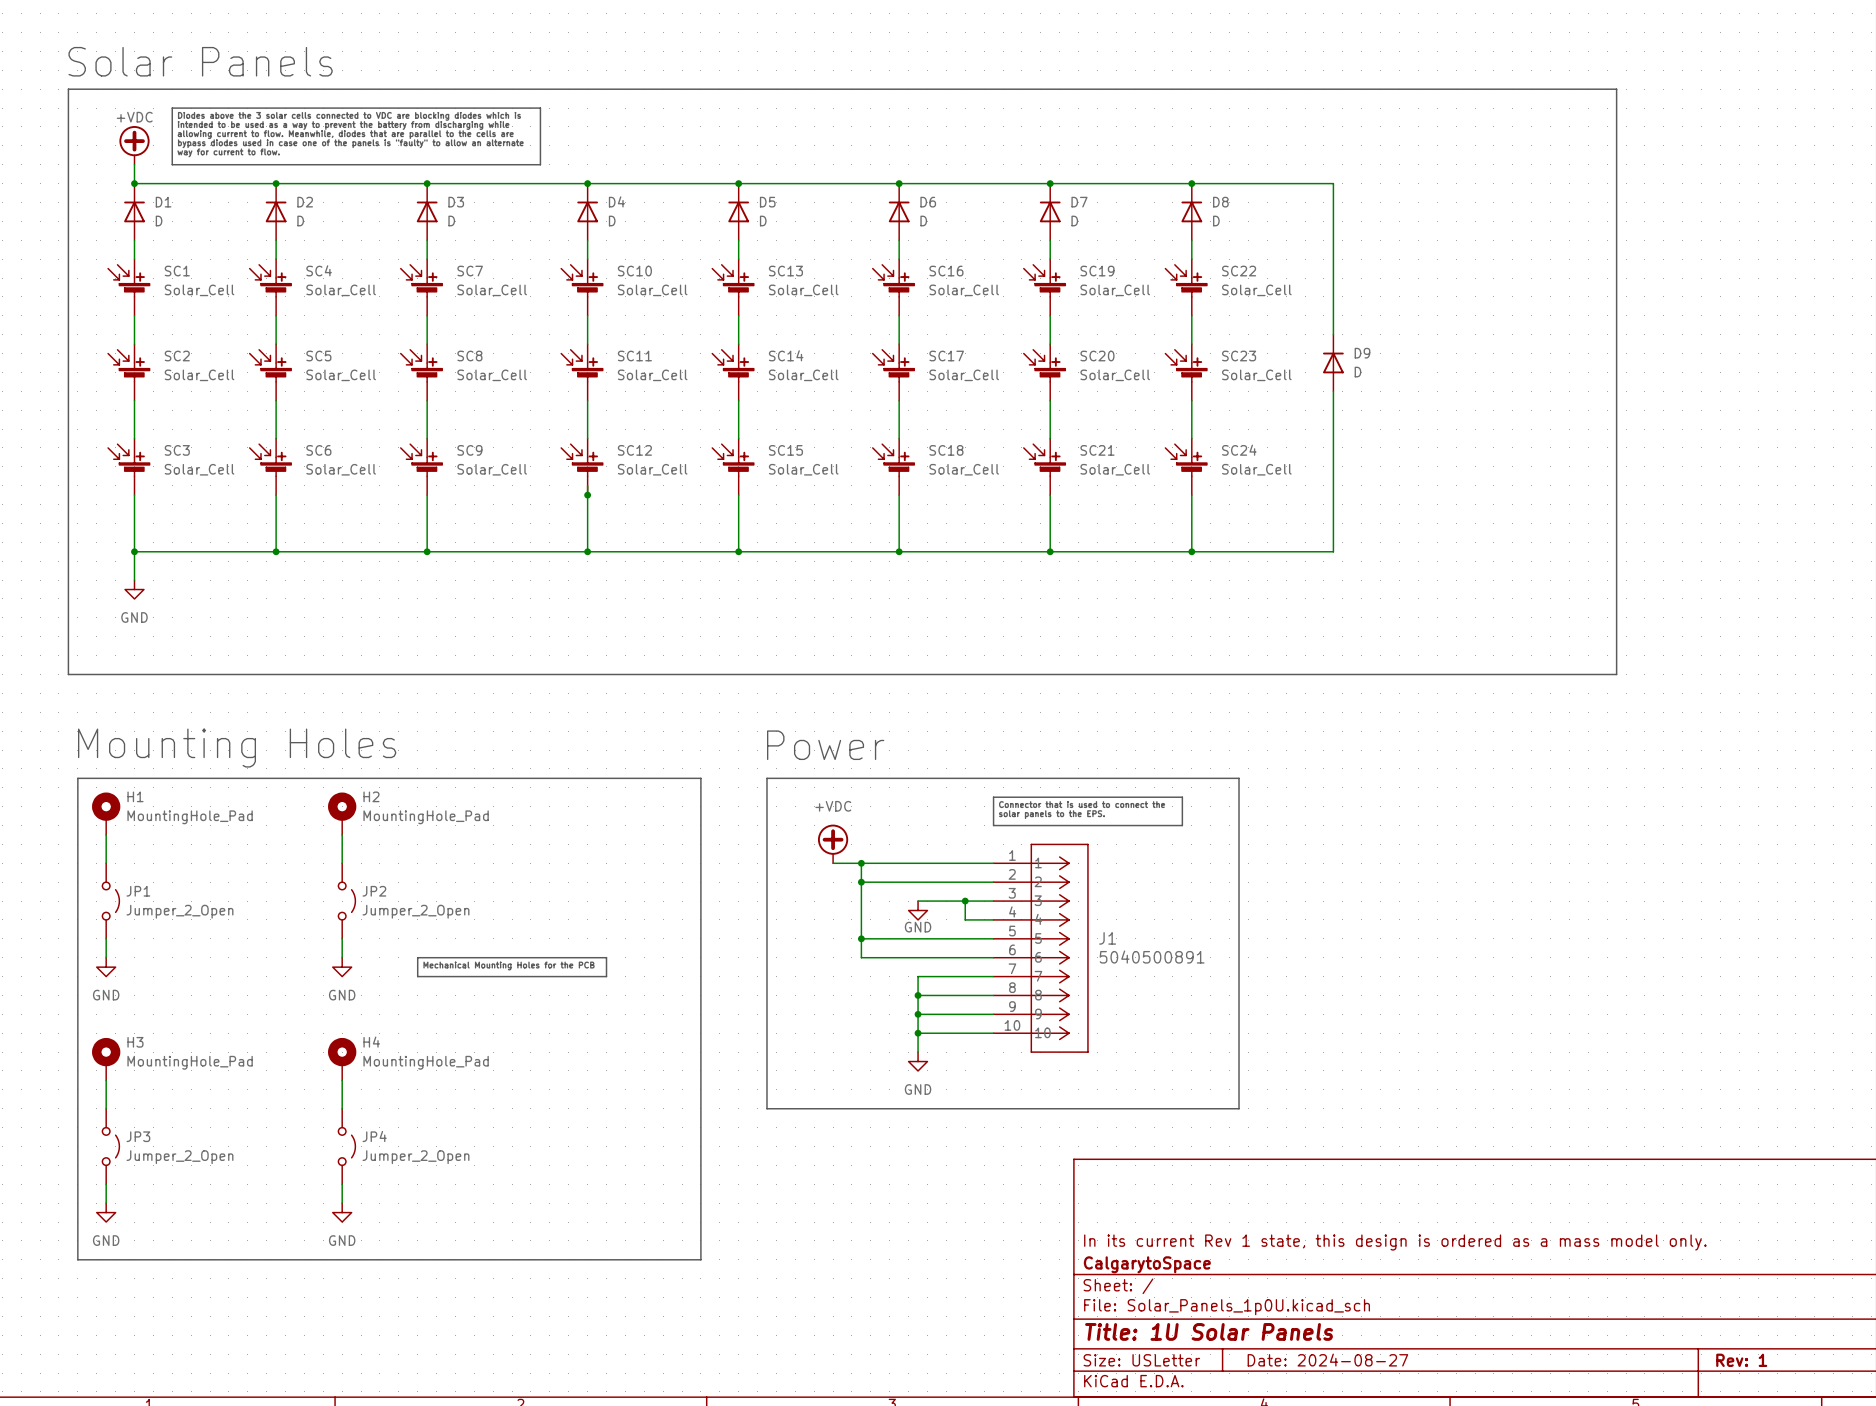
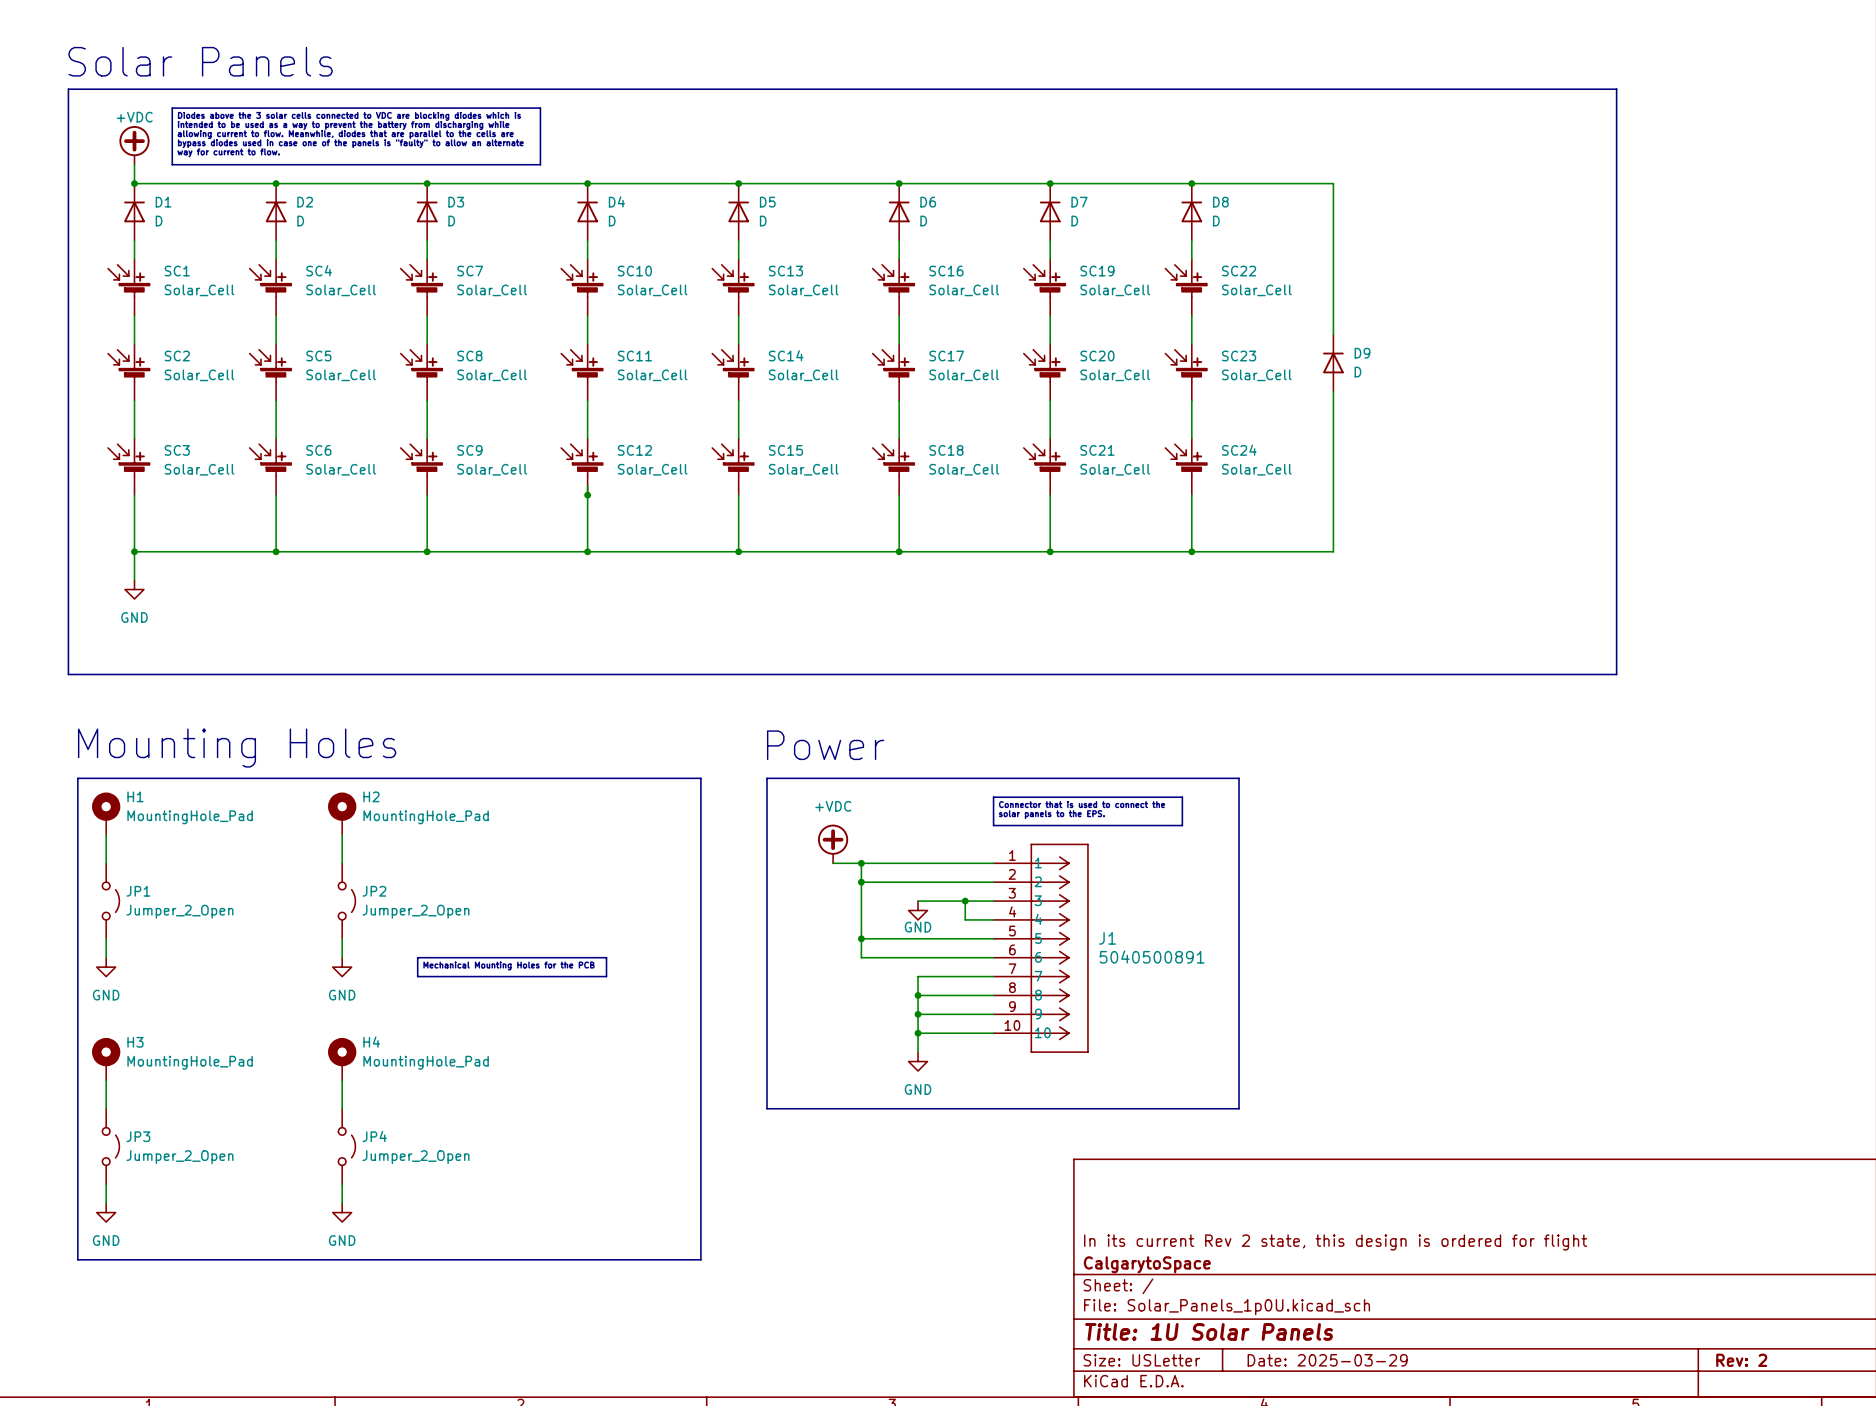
title block: In its current Rev 1 state, this design is ordered as a mass model only. (1395, 1242) -> In its current Rev 2 state, this design is ordered for flight (1335, 1242)
title block: Date: 2024-08-27 (1327, 1360) -> Date: 2025-03-29 (1327, 1360)
title block: Rev: 1 (1741, 1360) -> Rev: 2 (1741, 1360)

